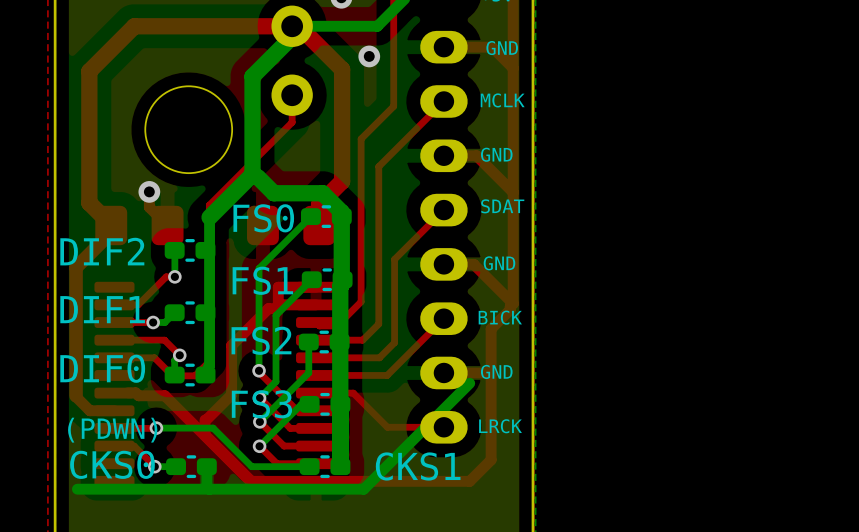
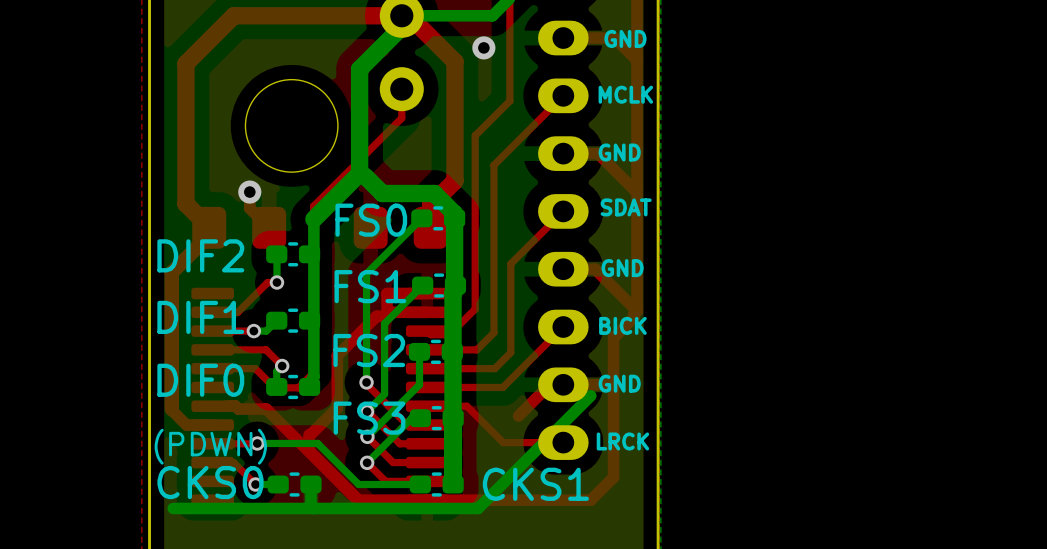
top track: none -> (563, 384) (549, 384) (518, 416)

